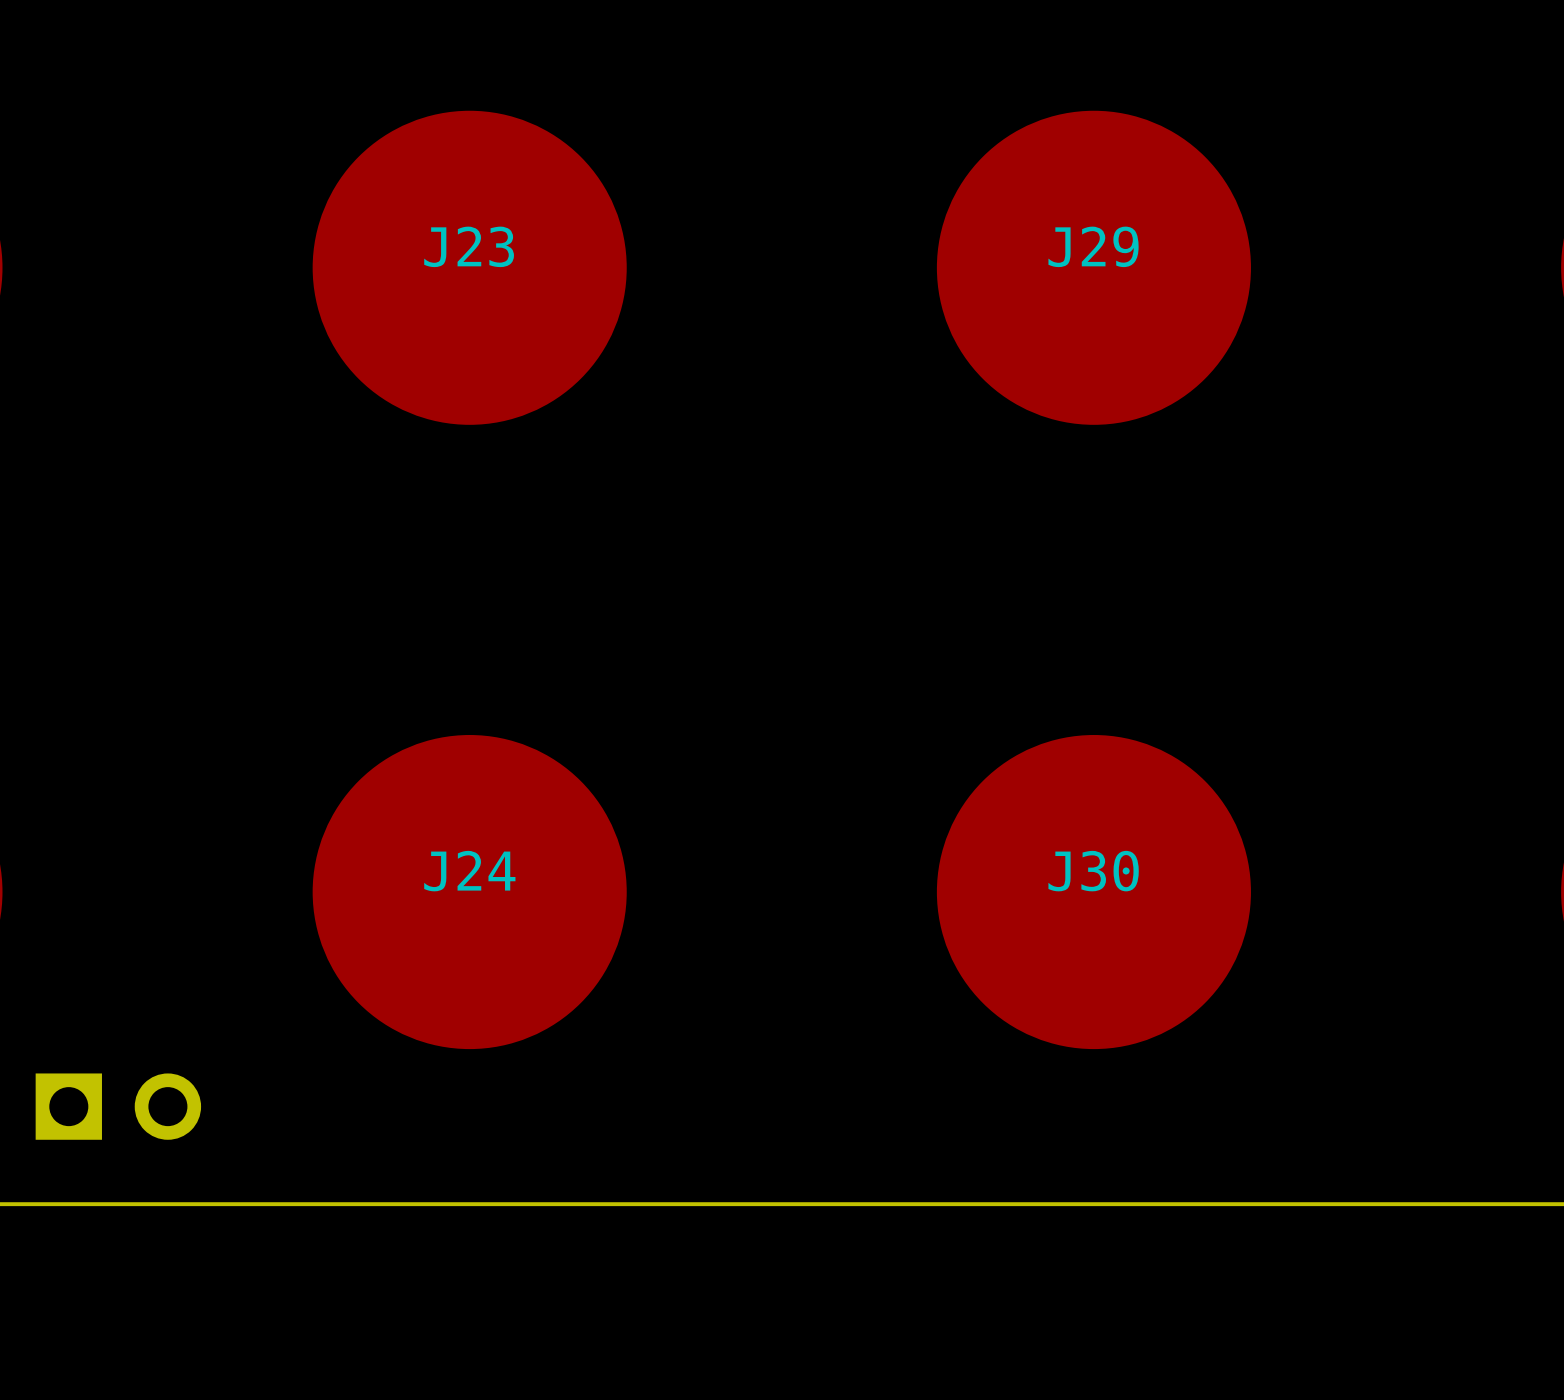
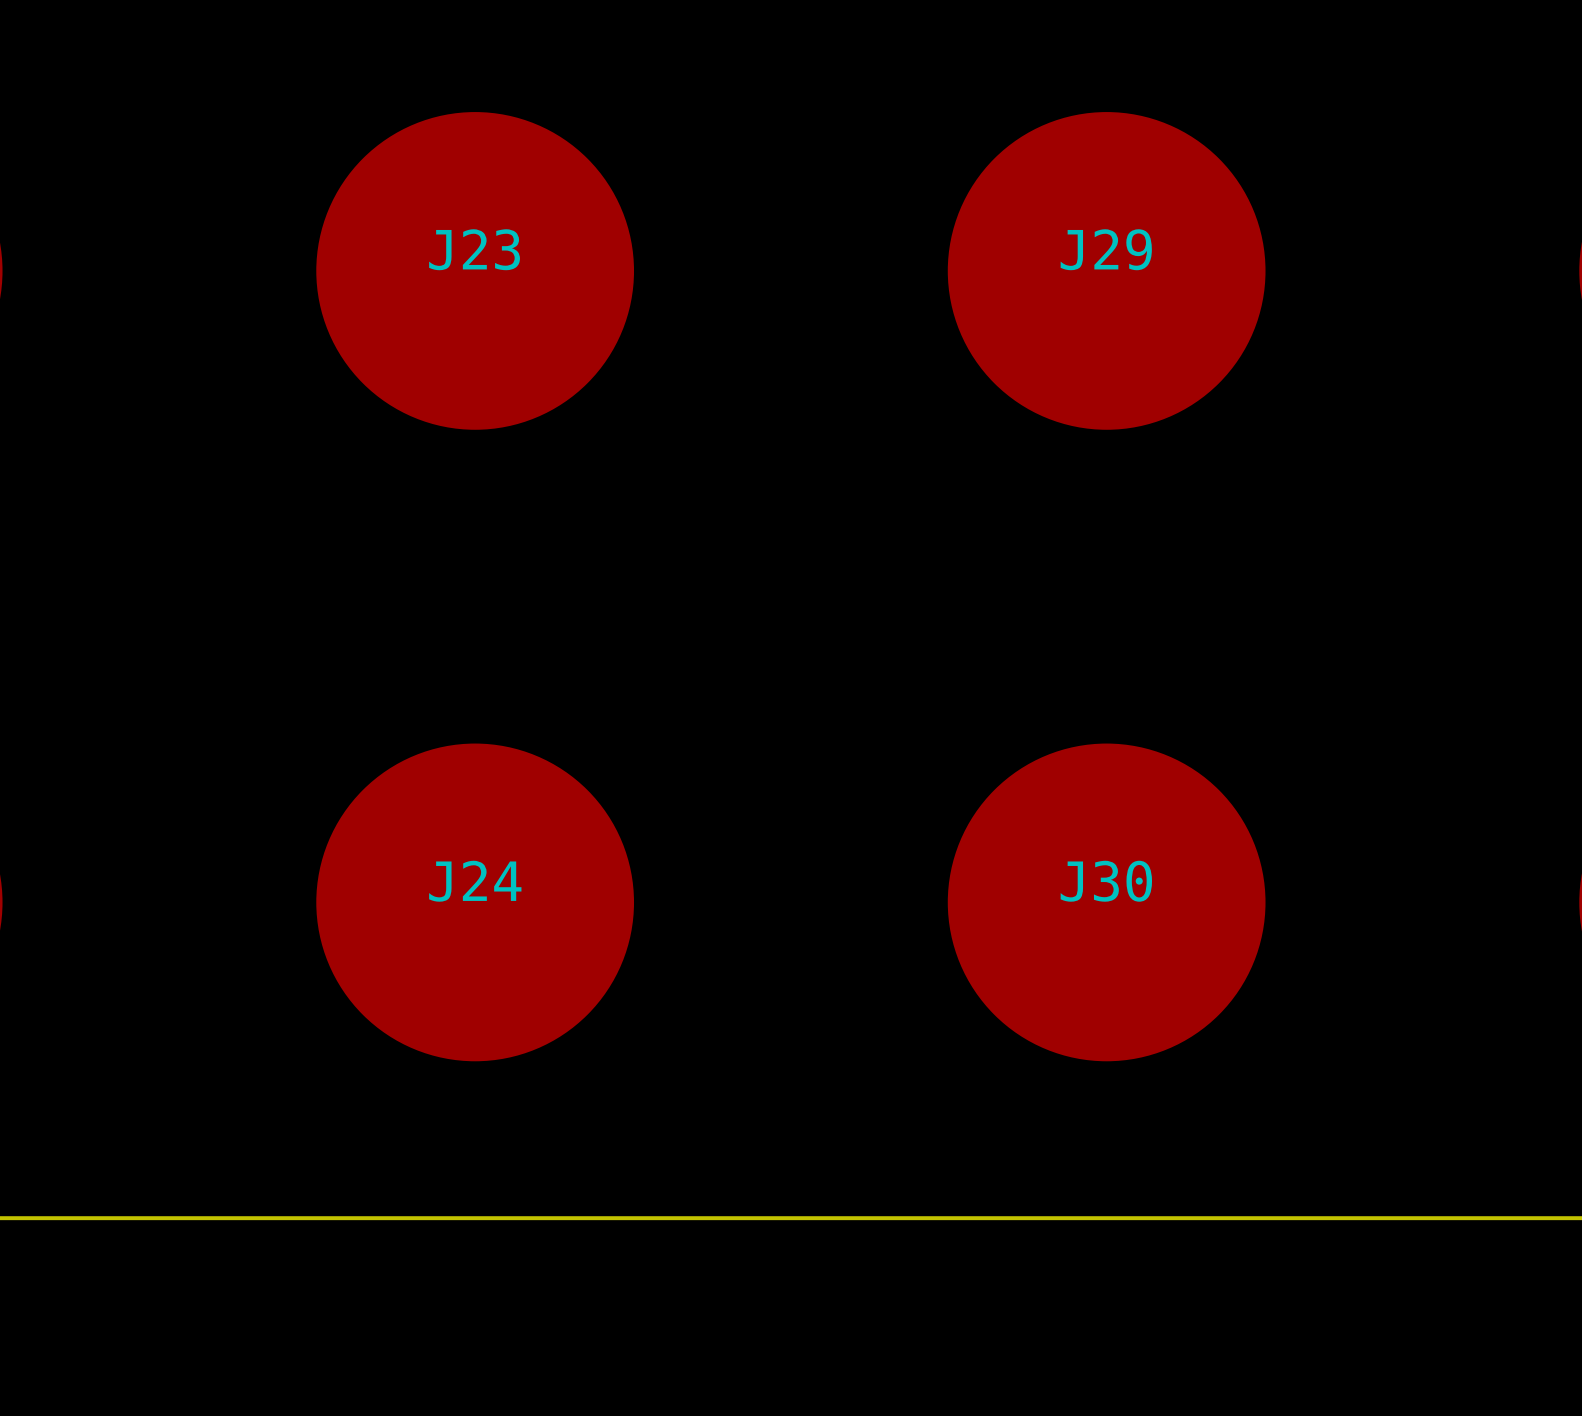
part: (118, 1106) -> none

